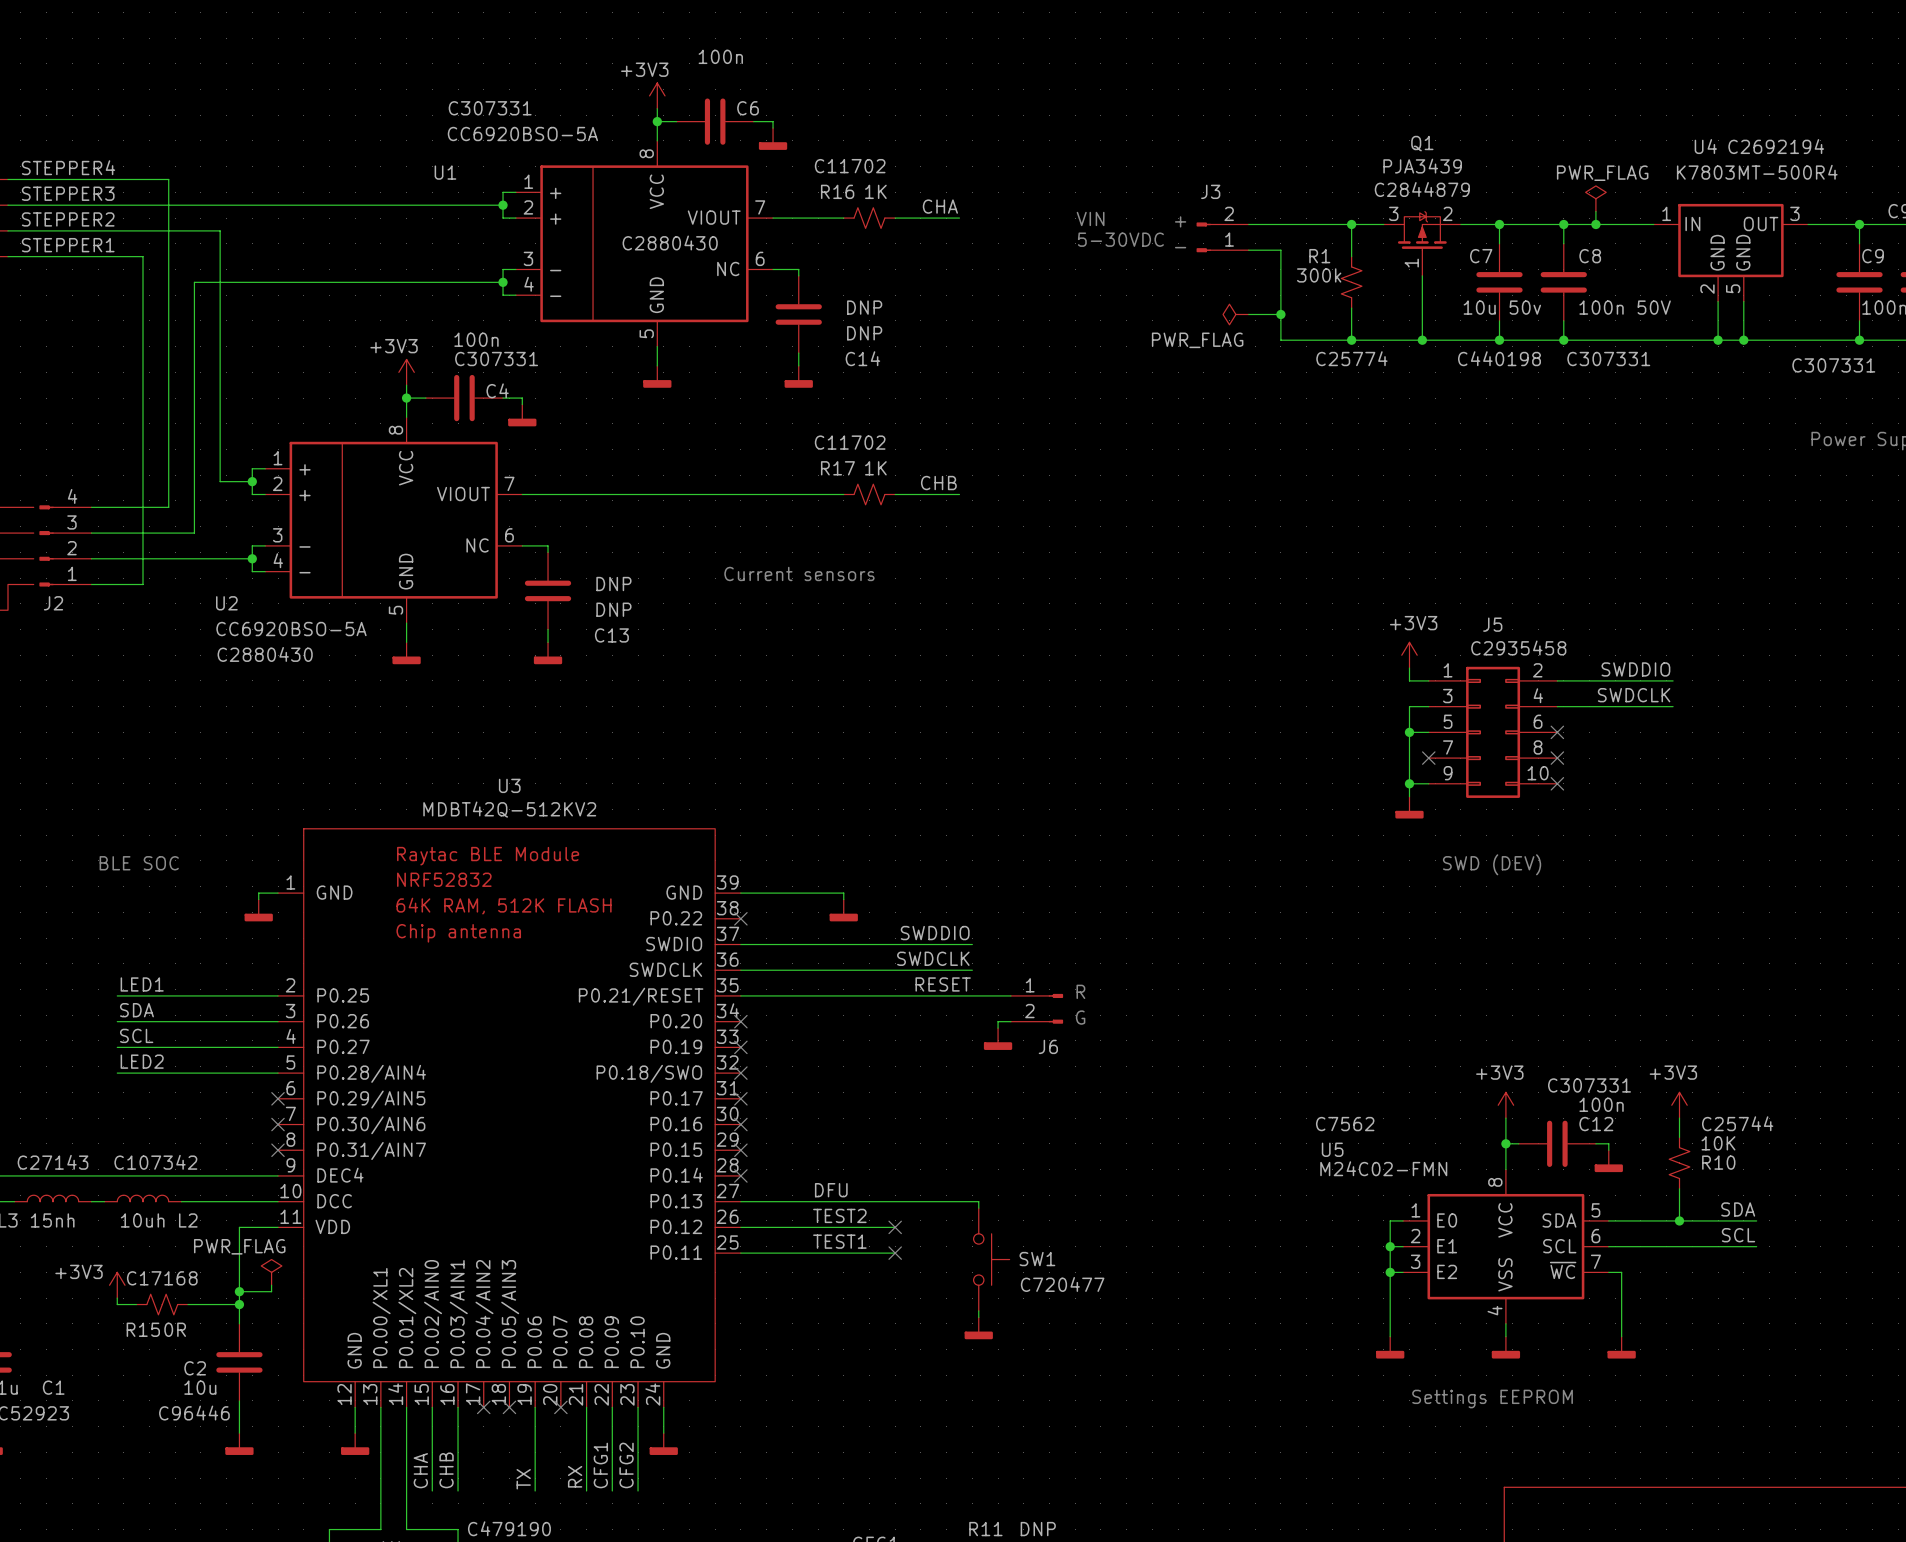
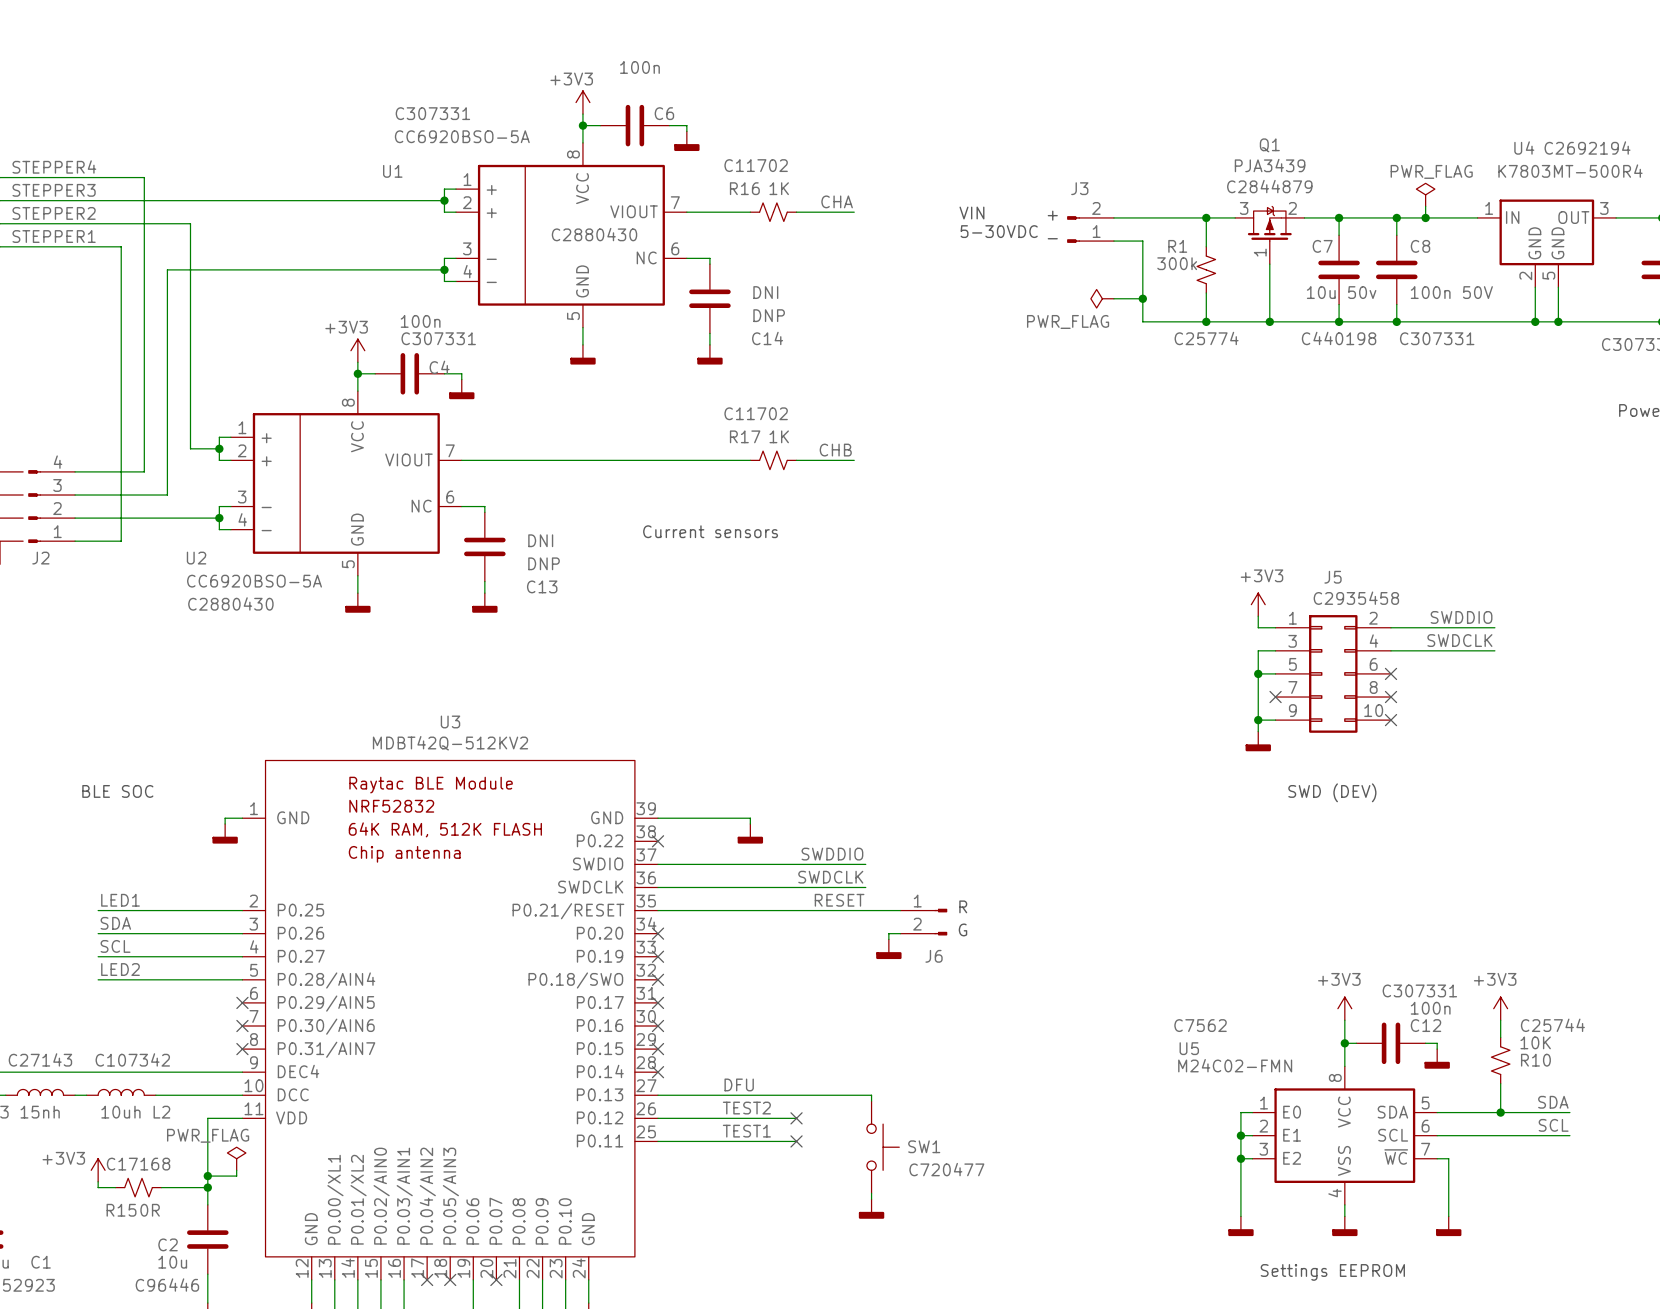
C14 value: DNP (864, 307) -> DNI (765, 292)
C13 value: DNP (613, 584) -> DNI (540, 540)

